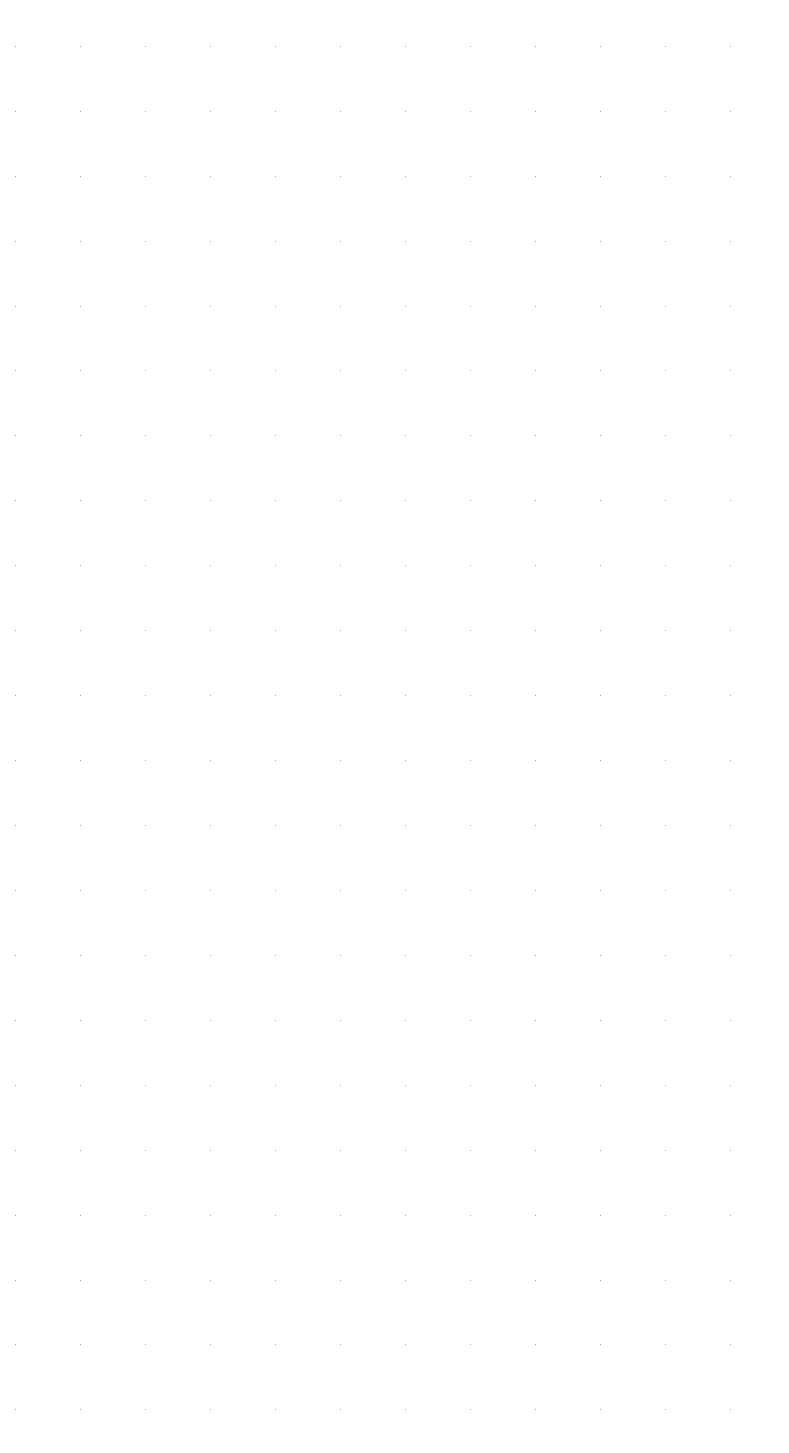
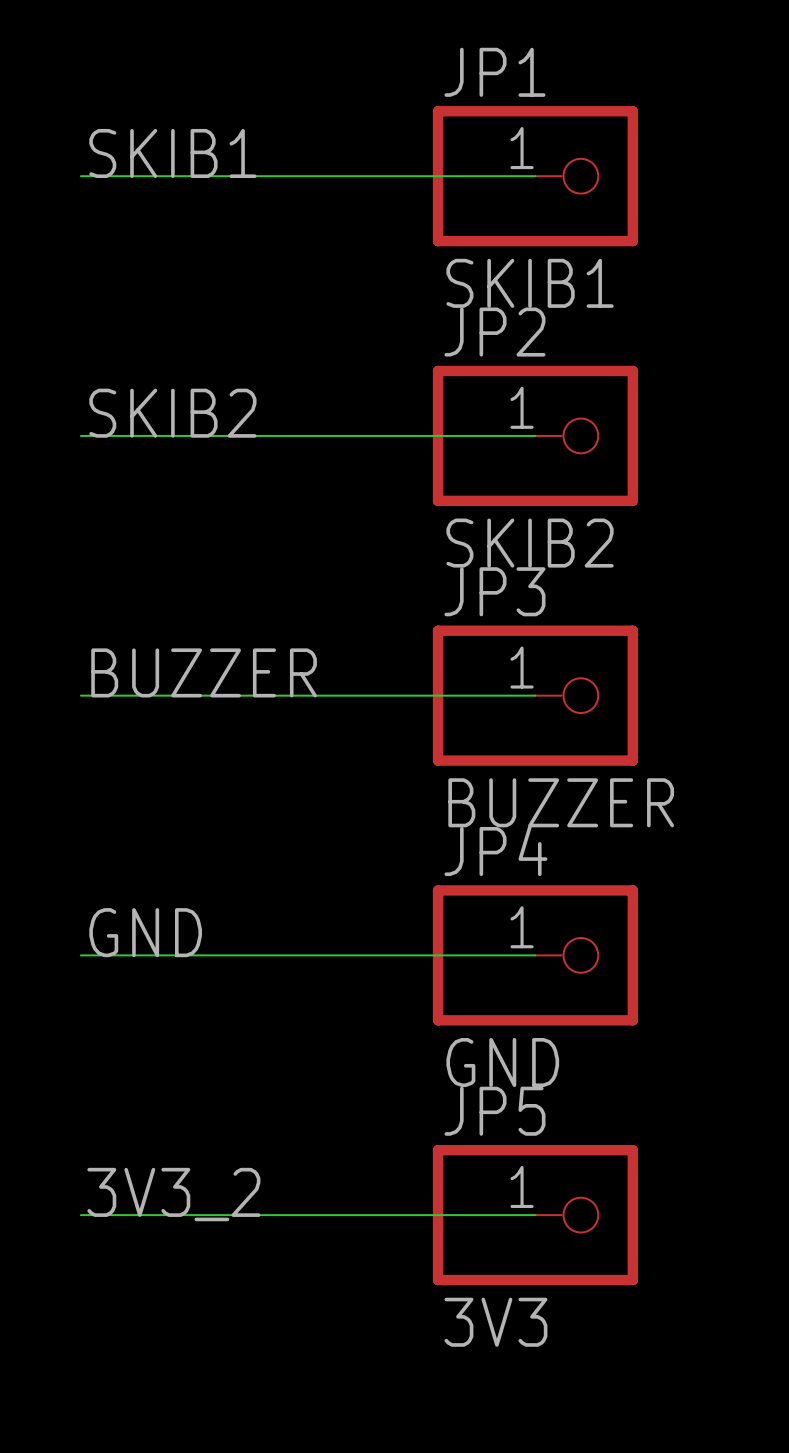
label: none -> SKIB1 (172, 153)
wire: none -> (80, 176) (535, 176)
JP1: none -> SKIB1 (535, 176)
label: none -> SKIB2 (172, 413)
wire: none -> (80, 435) (535, 435)
JP2: none -> SKIB2 (535, 435)
label: none -> BUZZER (204, 672)
wire: none -> (80, 695) (535, 695)
JP3: none -> BUZZER (535, 695)
label: none -> GND (145, 932)
wire: none -> (80, 955) (535, 955)
JP4: none -> GND (535, 955)
label: none -> 3V3_2 (173, 1194)
wire: none -> (80, 1215) (535, 1215)
JP5: none -> 3V3 (535, 1215)

